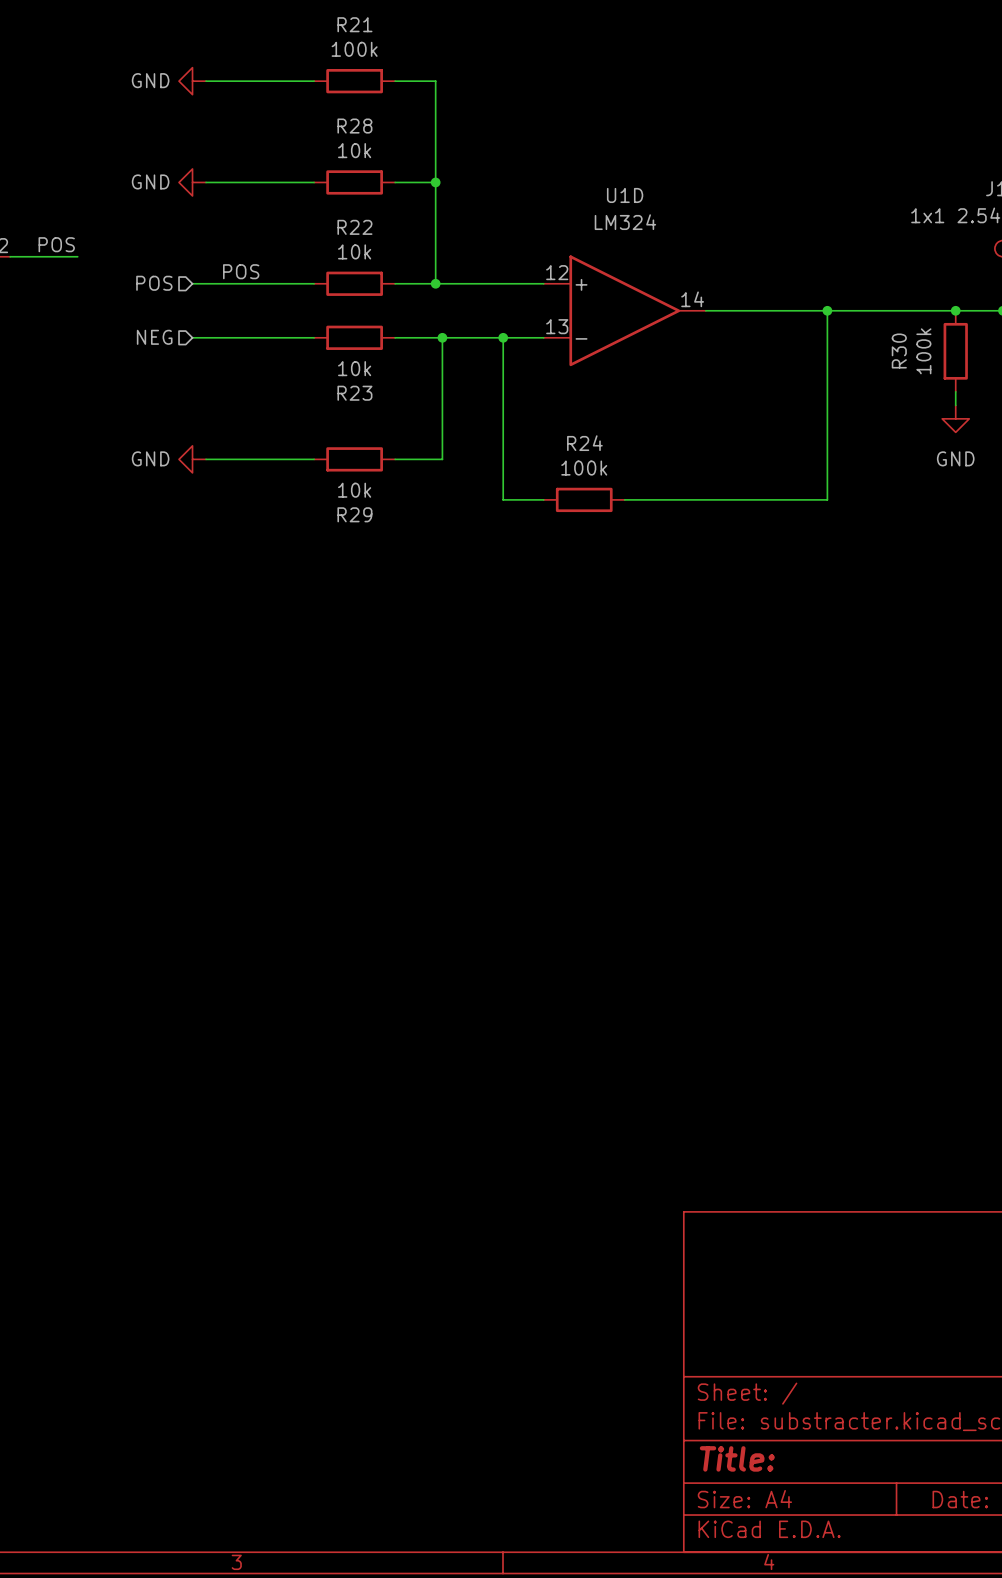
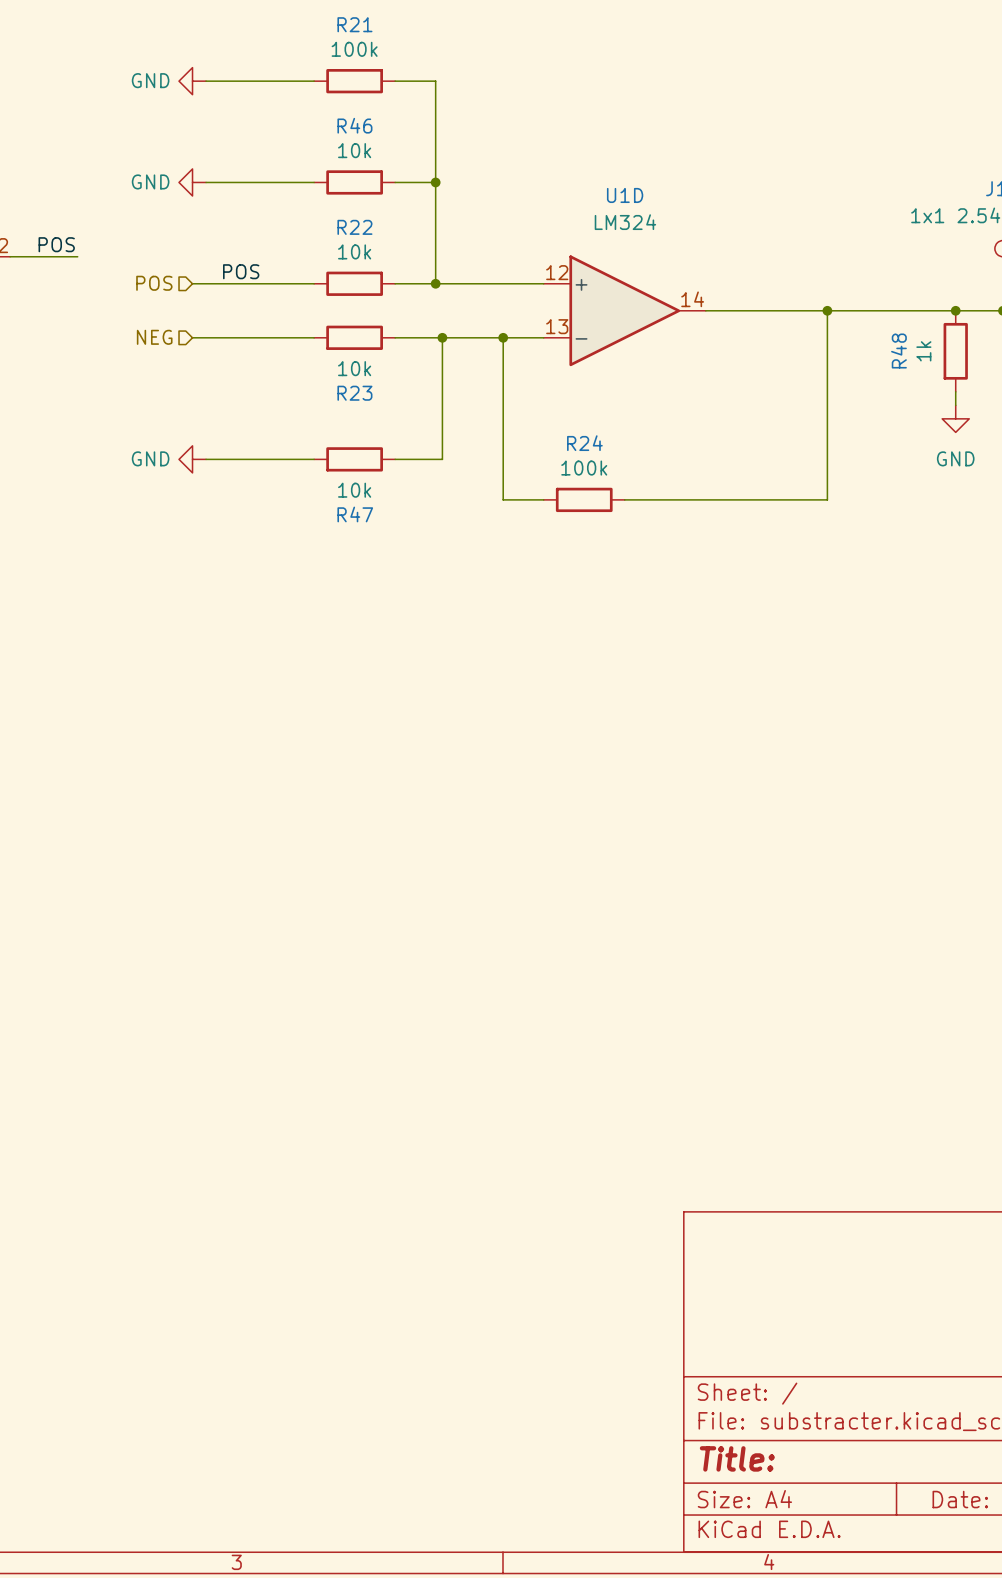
R28 name: R28 (354, 126) -> R46 (354, 125)
R30 name: R30 (899, 350) -> R48 (898, 350)
R30 value: 100k (923, 351) -> 1k (923, 351)
R29 name: R29 (354, 514) -> R47 (355, 514)

